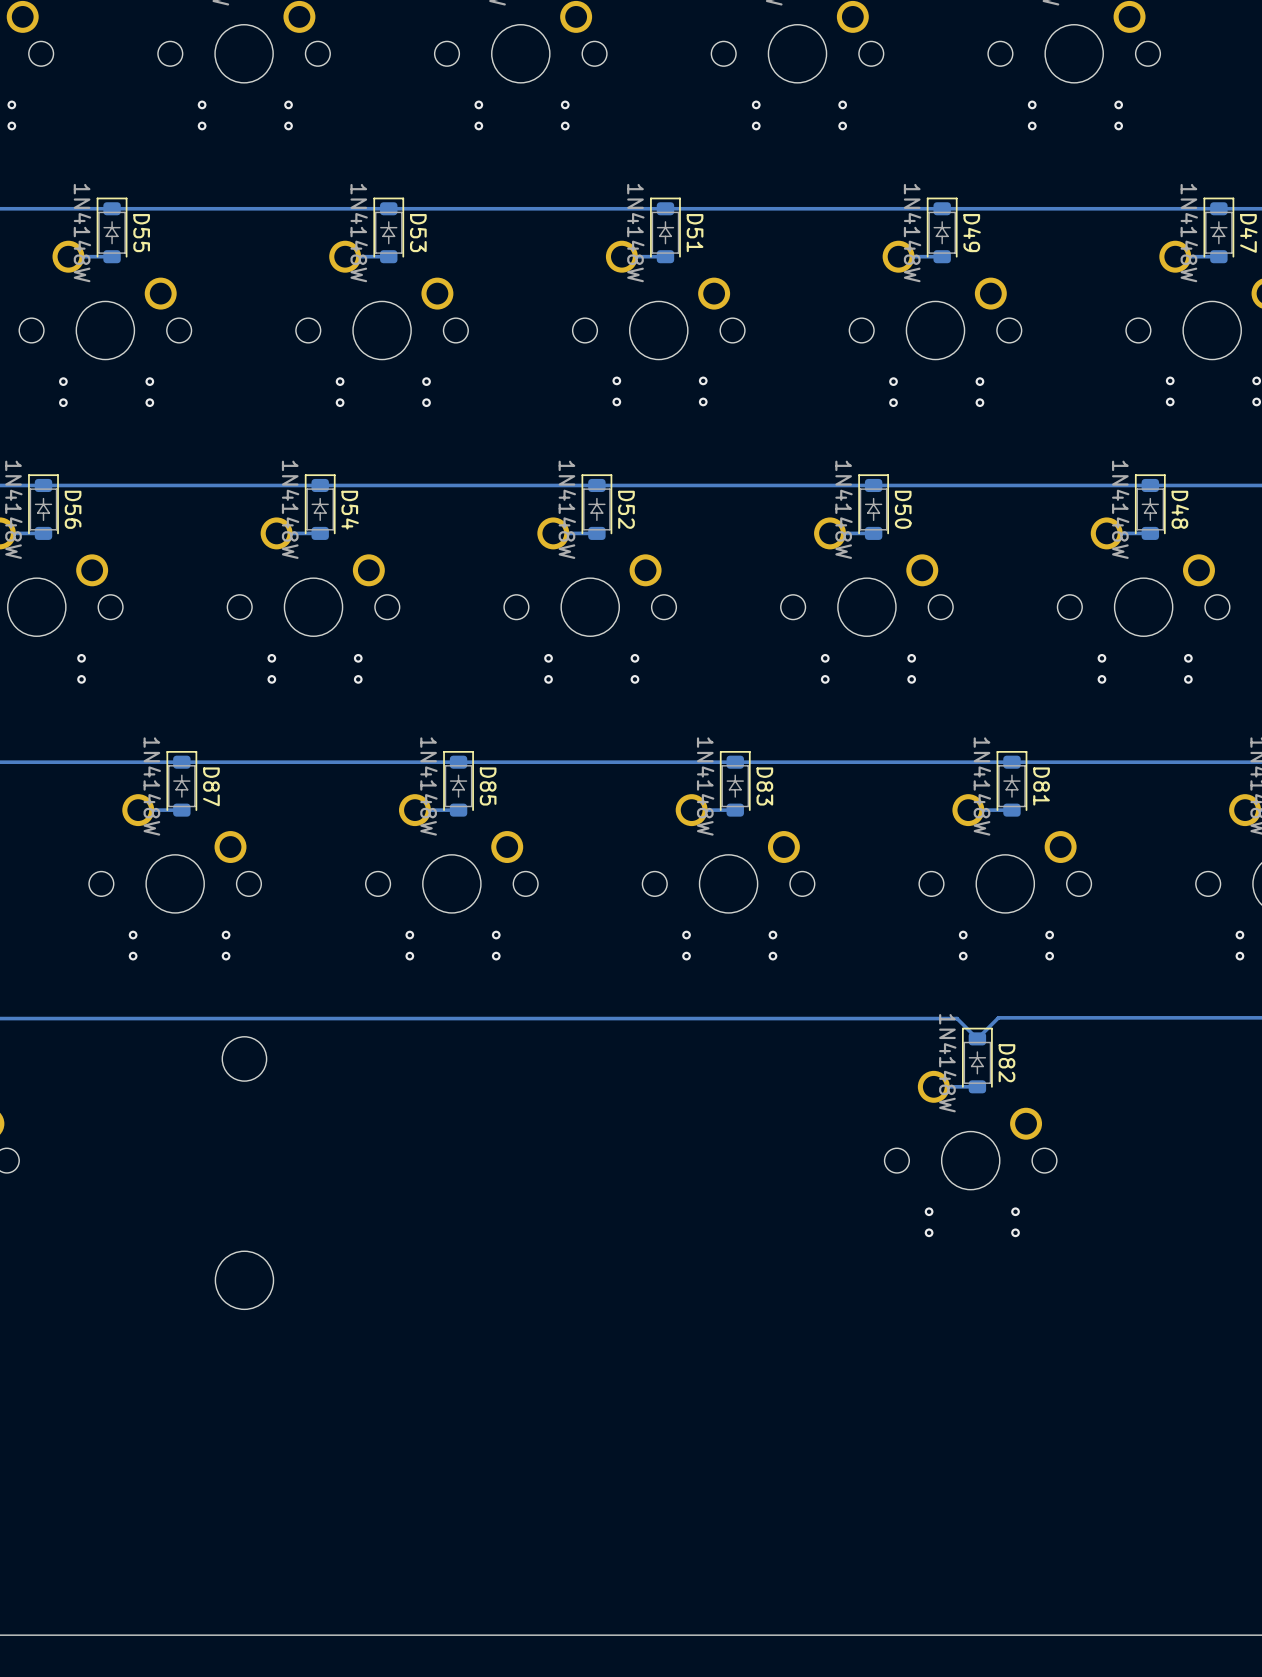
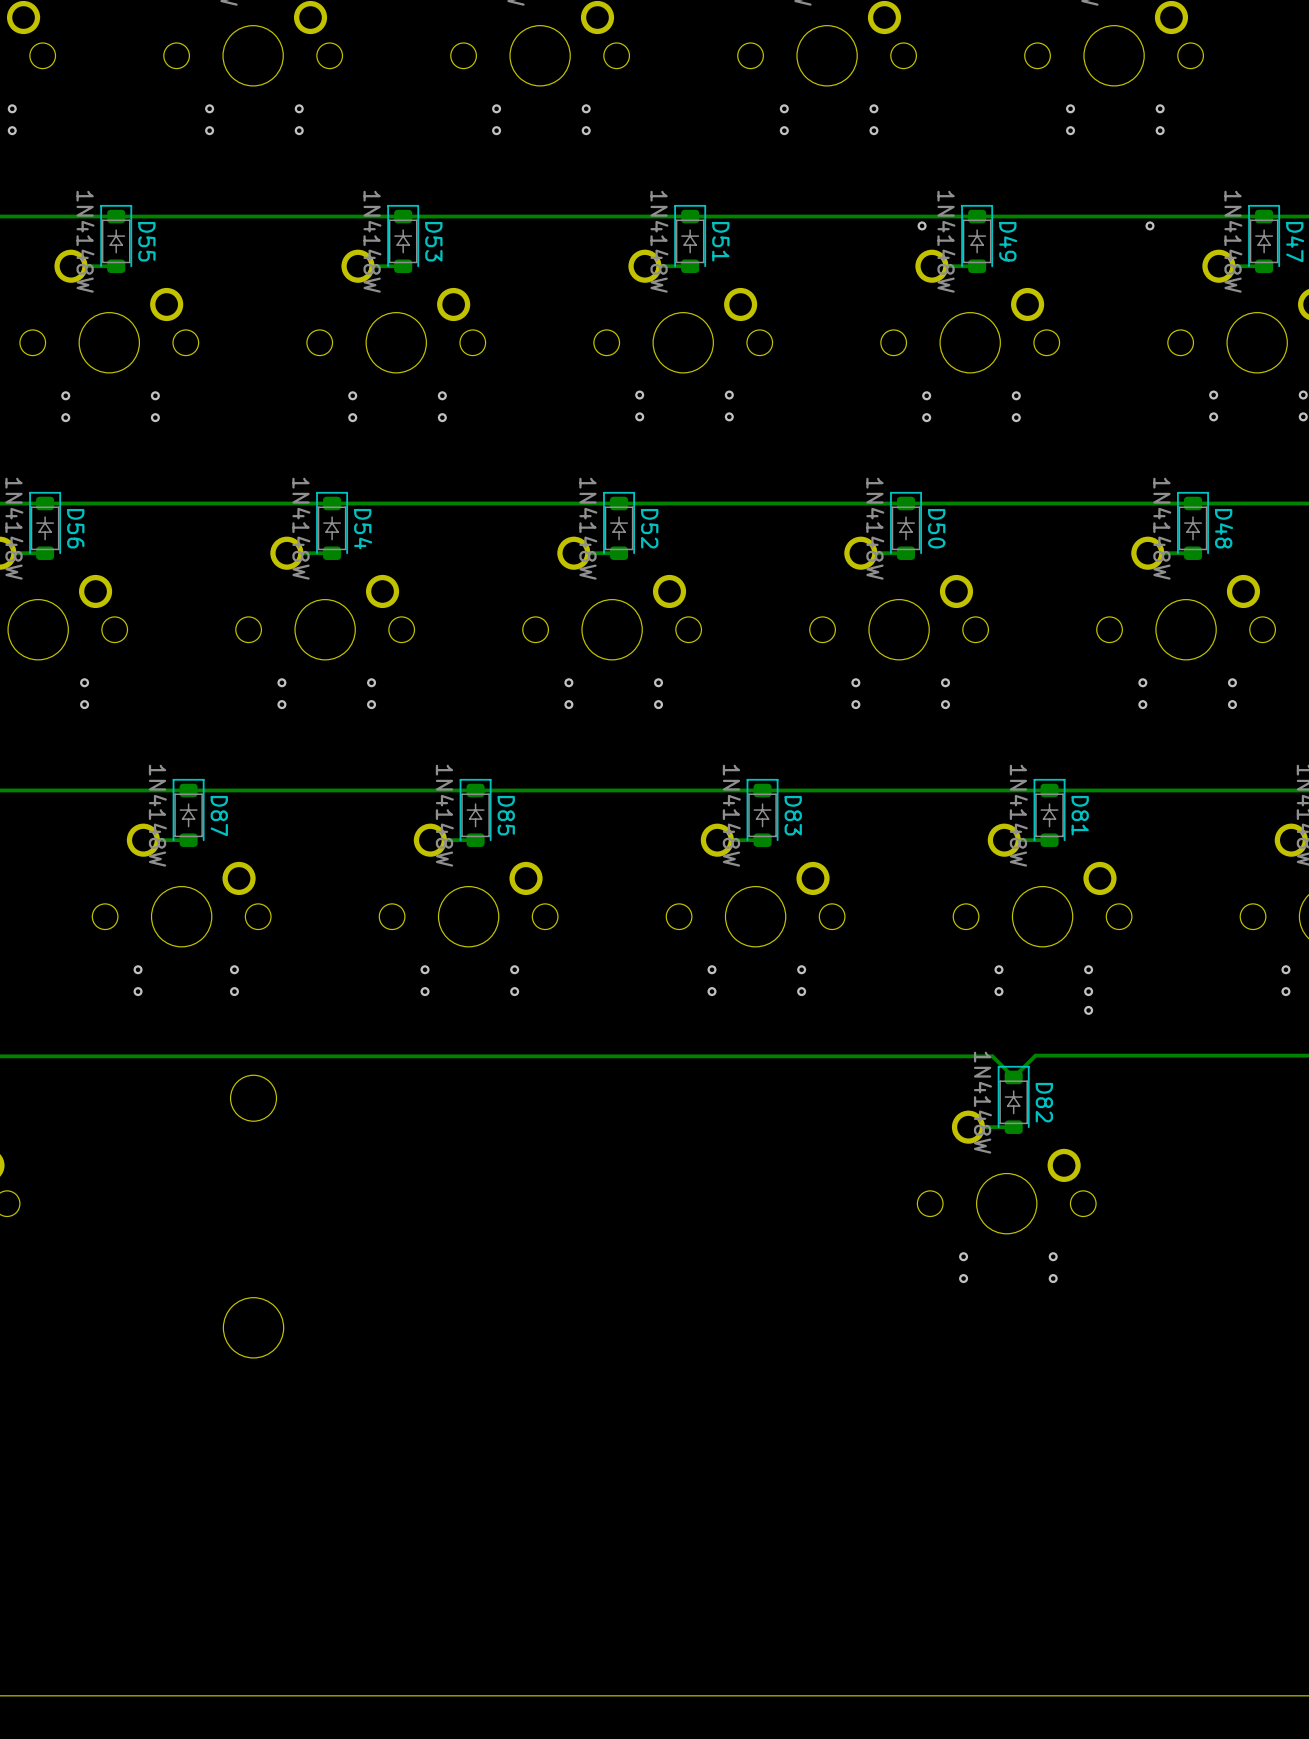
via: none -> (922, 225)
via: none -> (1150, 225)
via: none -> (1088, 1010)

